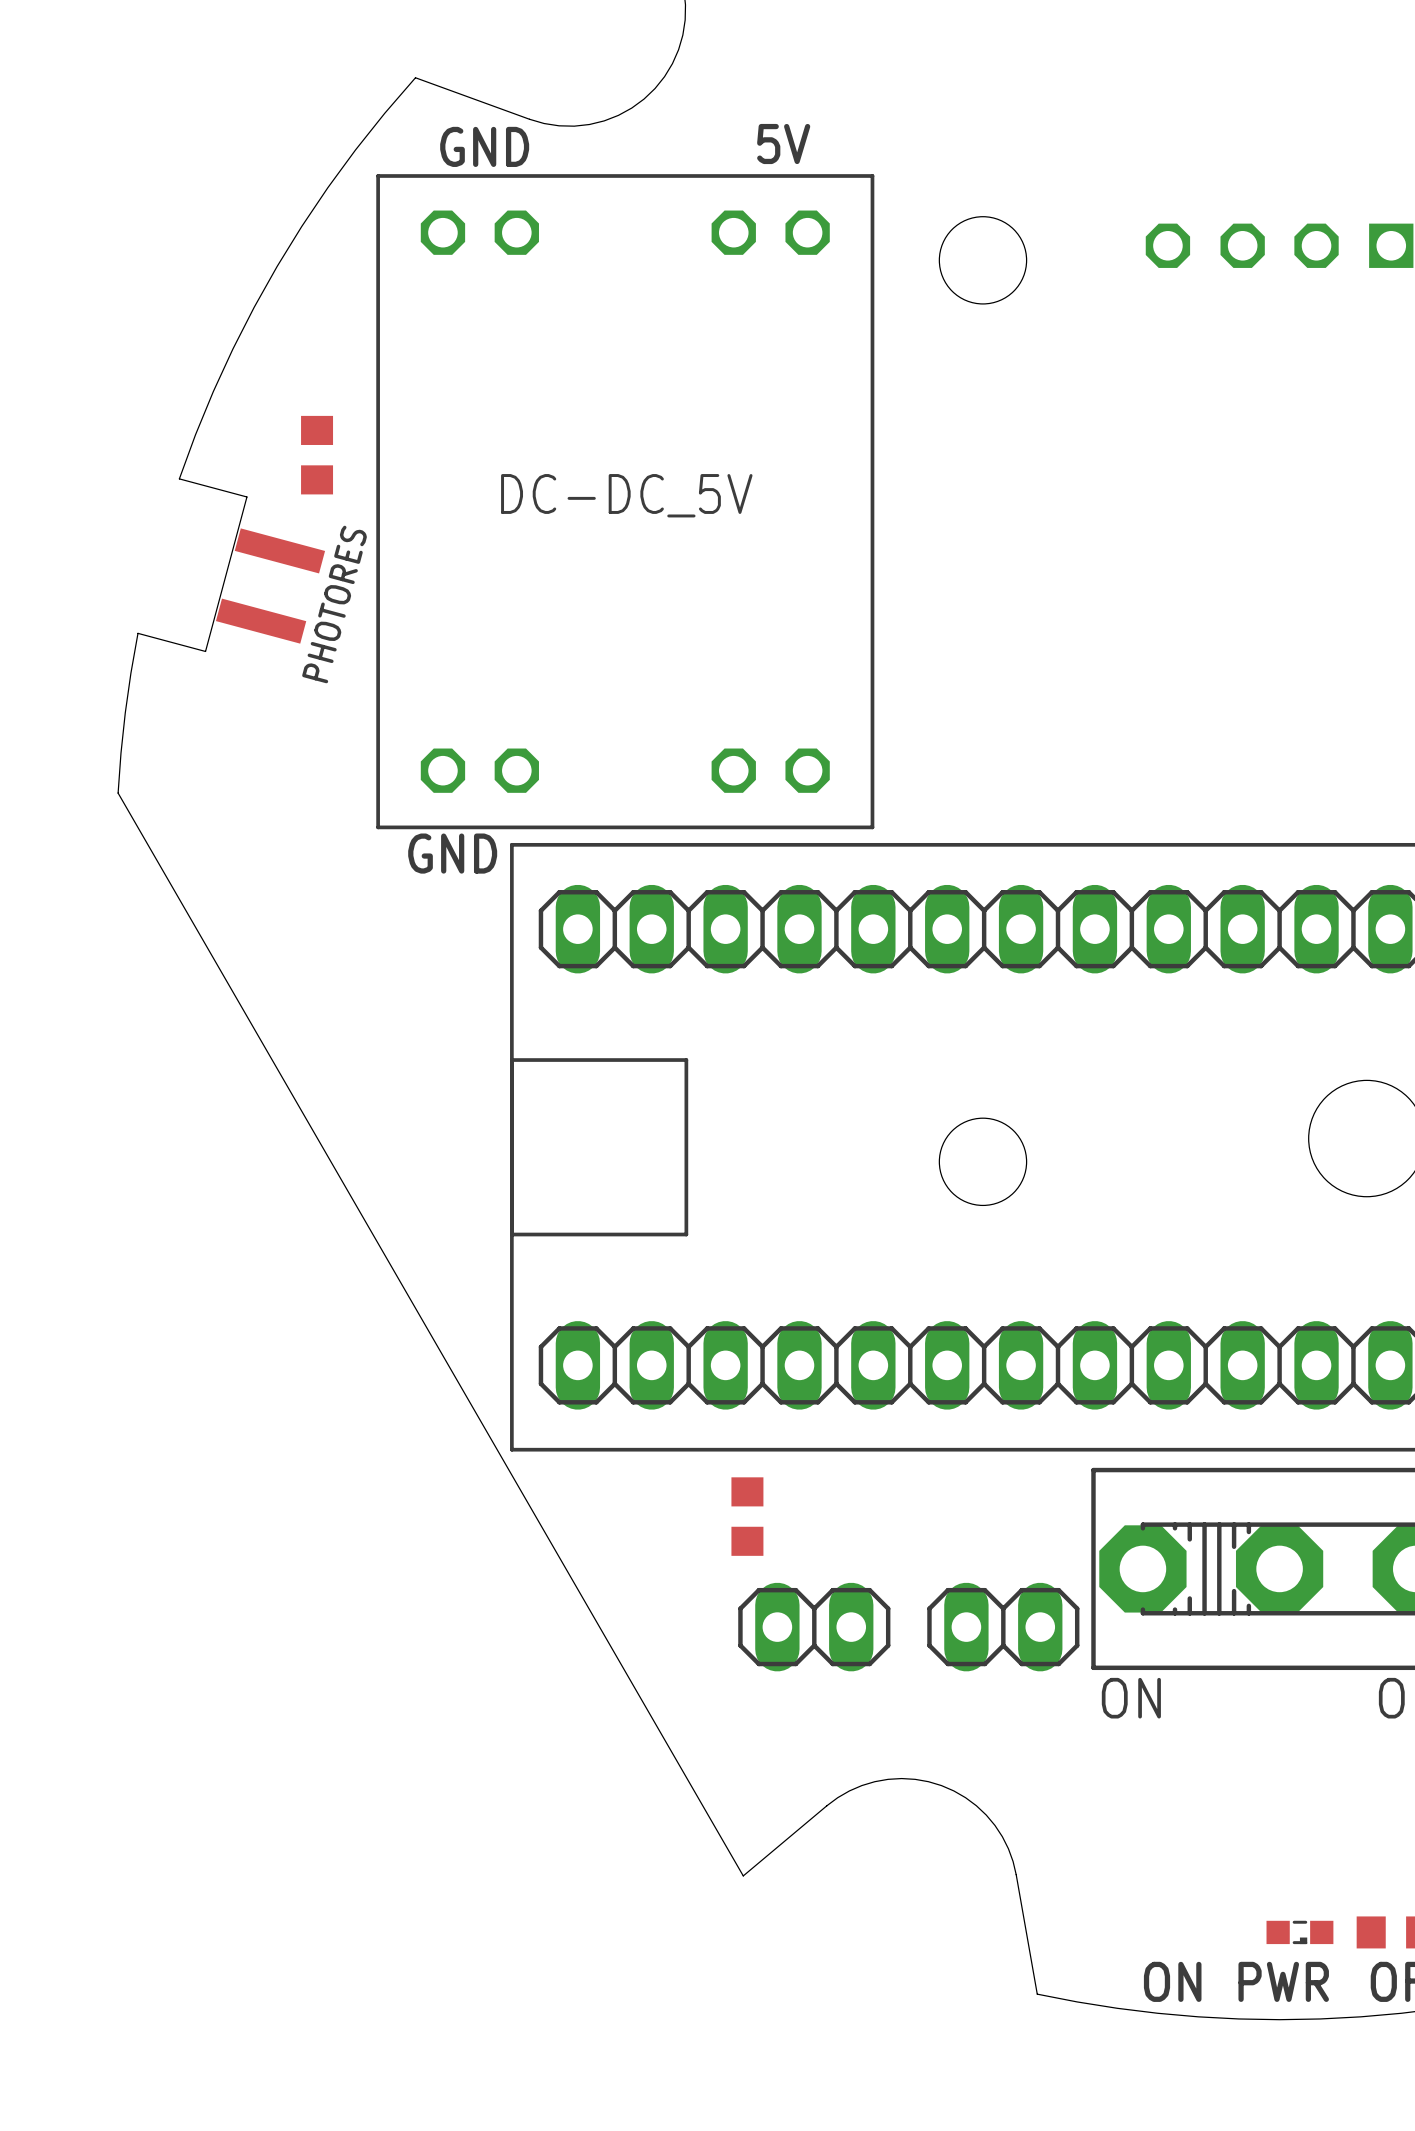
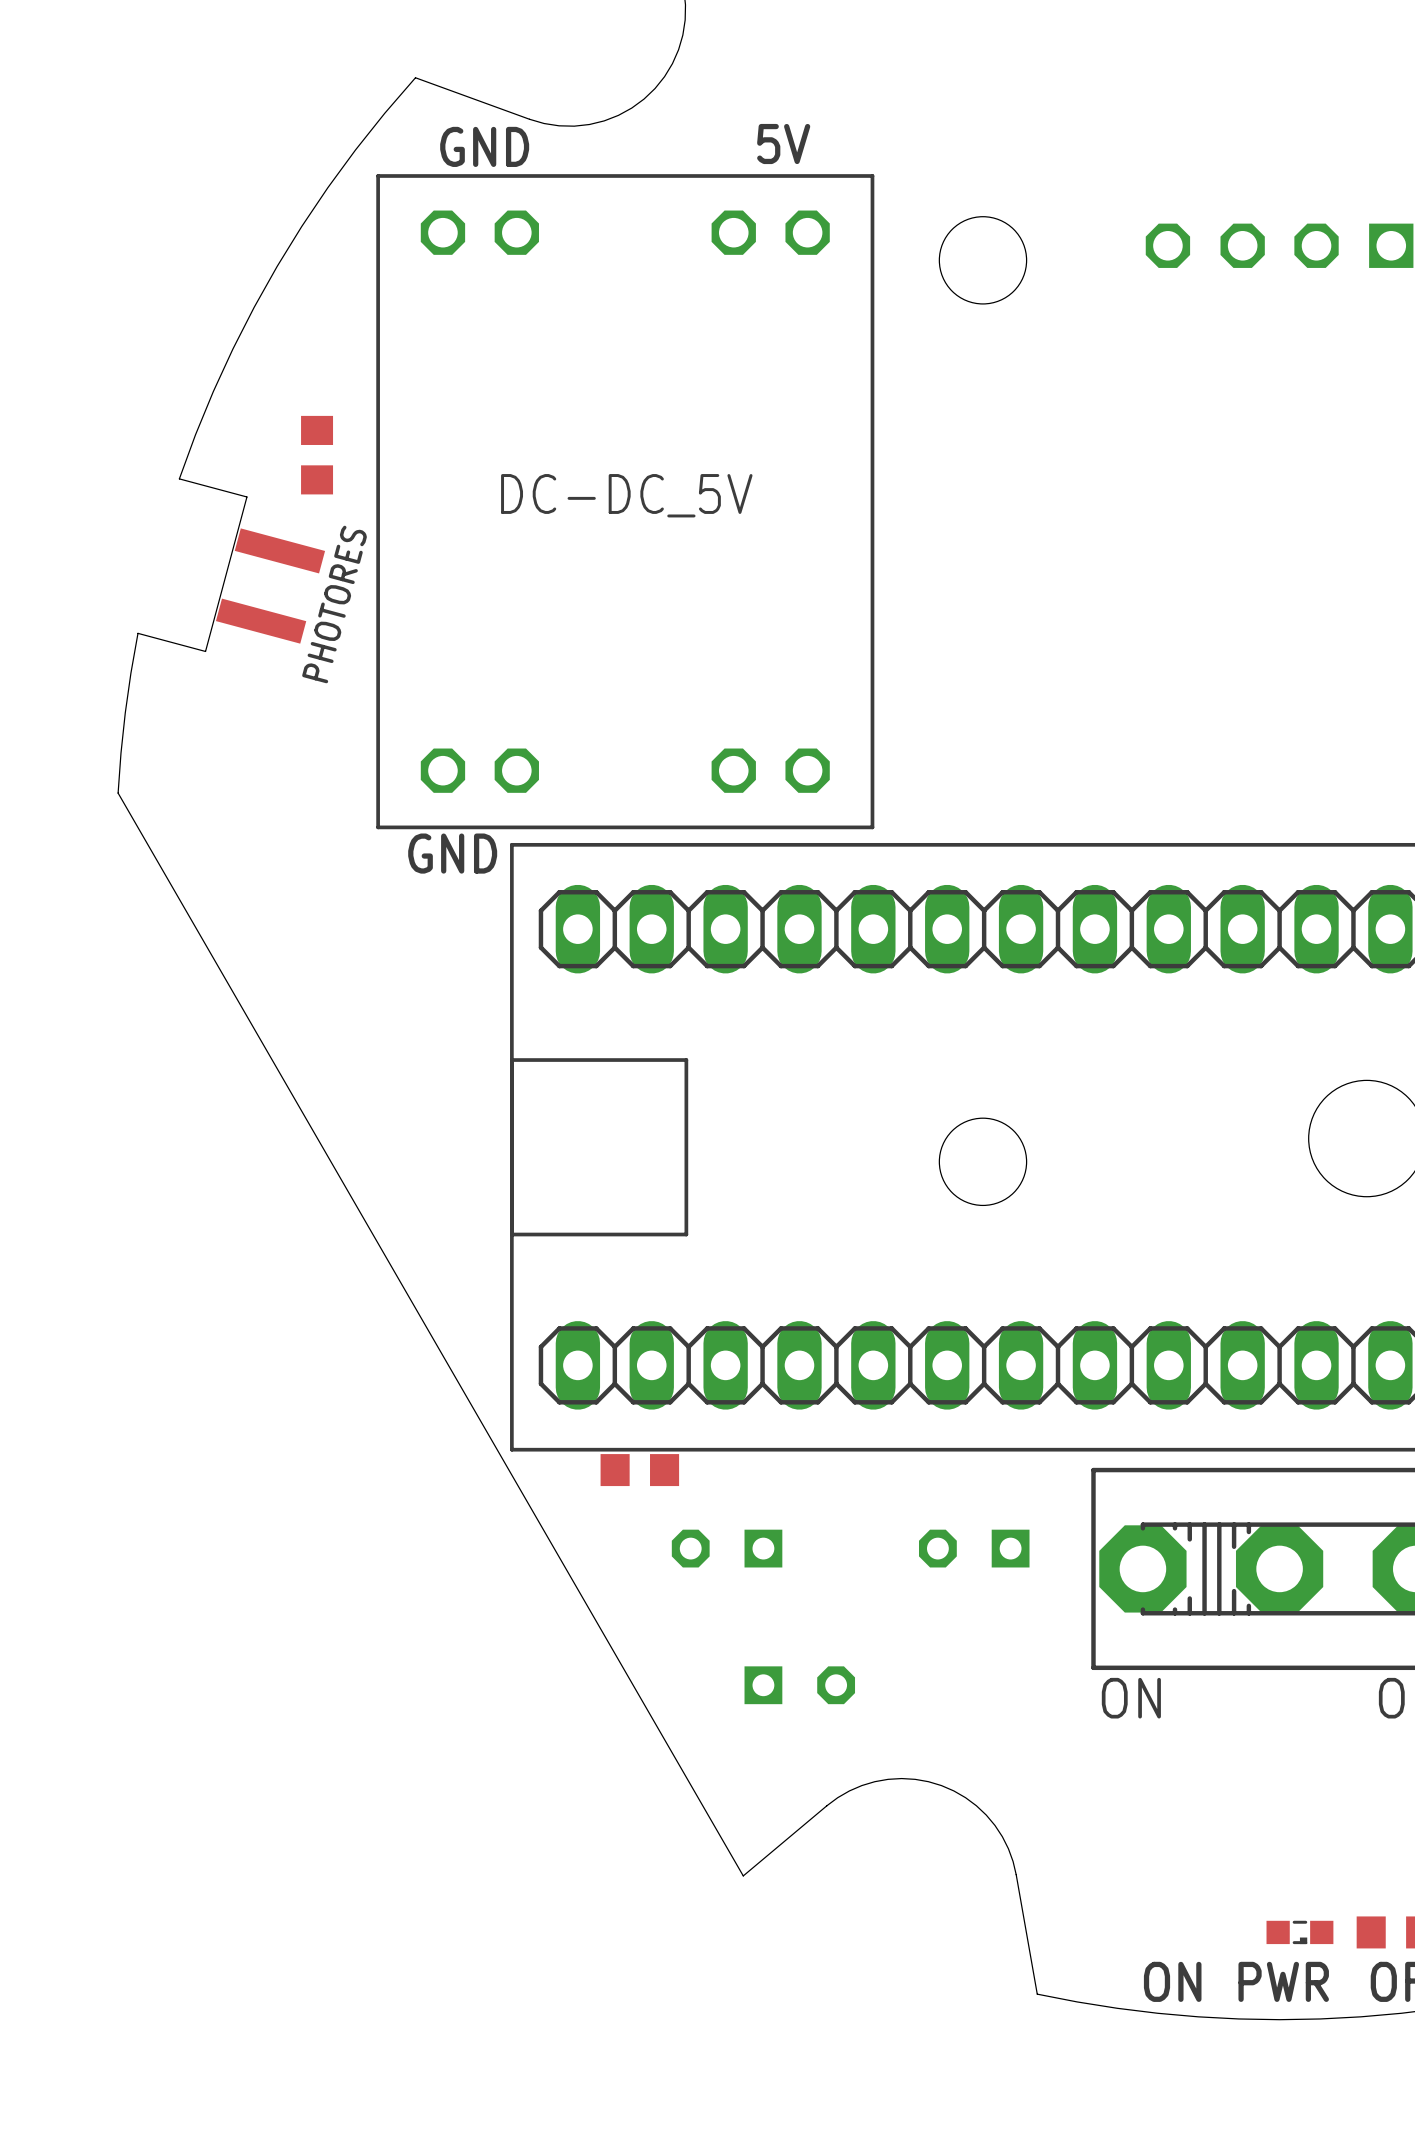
part rotation: 0° (747, 1516) -> 90° clockwise (639, 1470)
part position: (747, 1516) -> (639, 1470)
part: none -> (727, 1548)
part: none -> (974, 1548)
part: (814, 1627) -> none
part: (1003, 1627) -> none
part: none -> (799, 1685)

